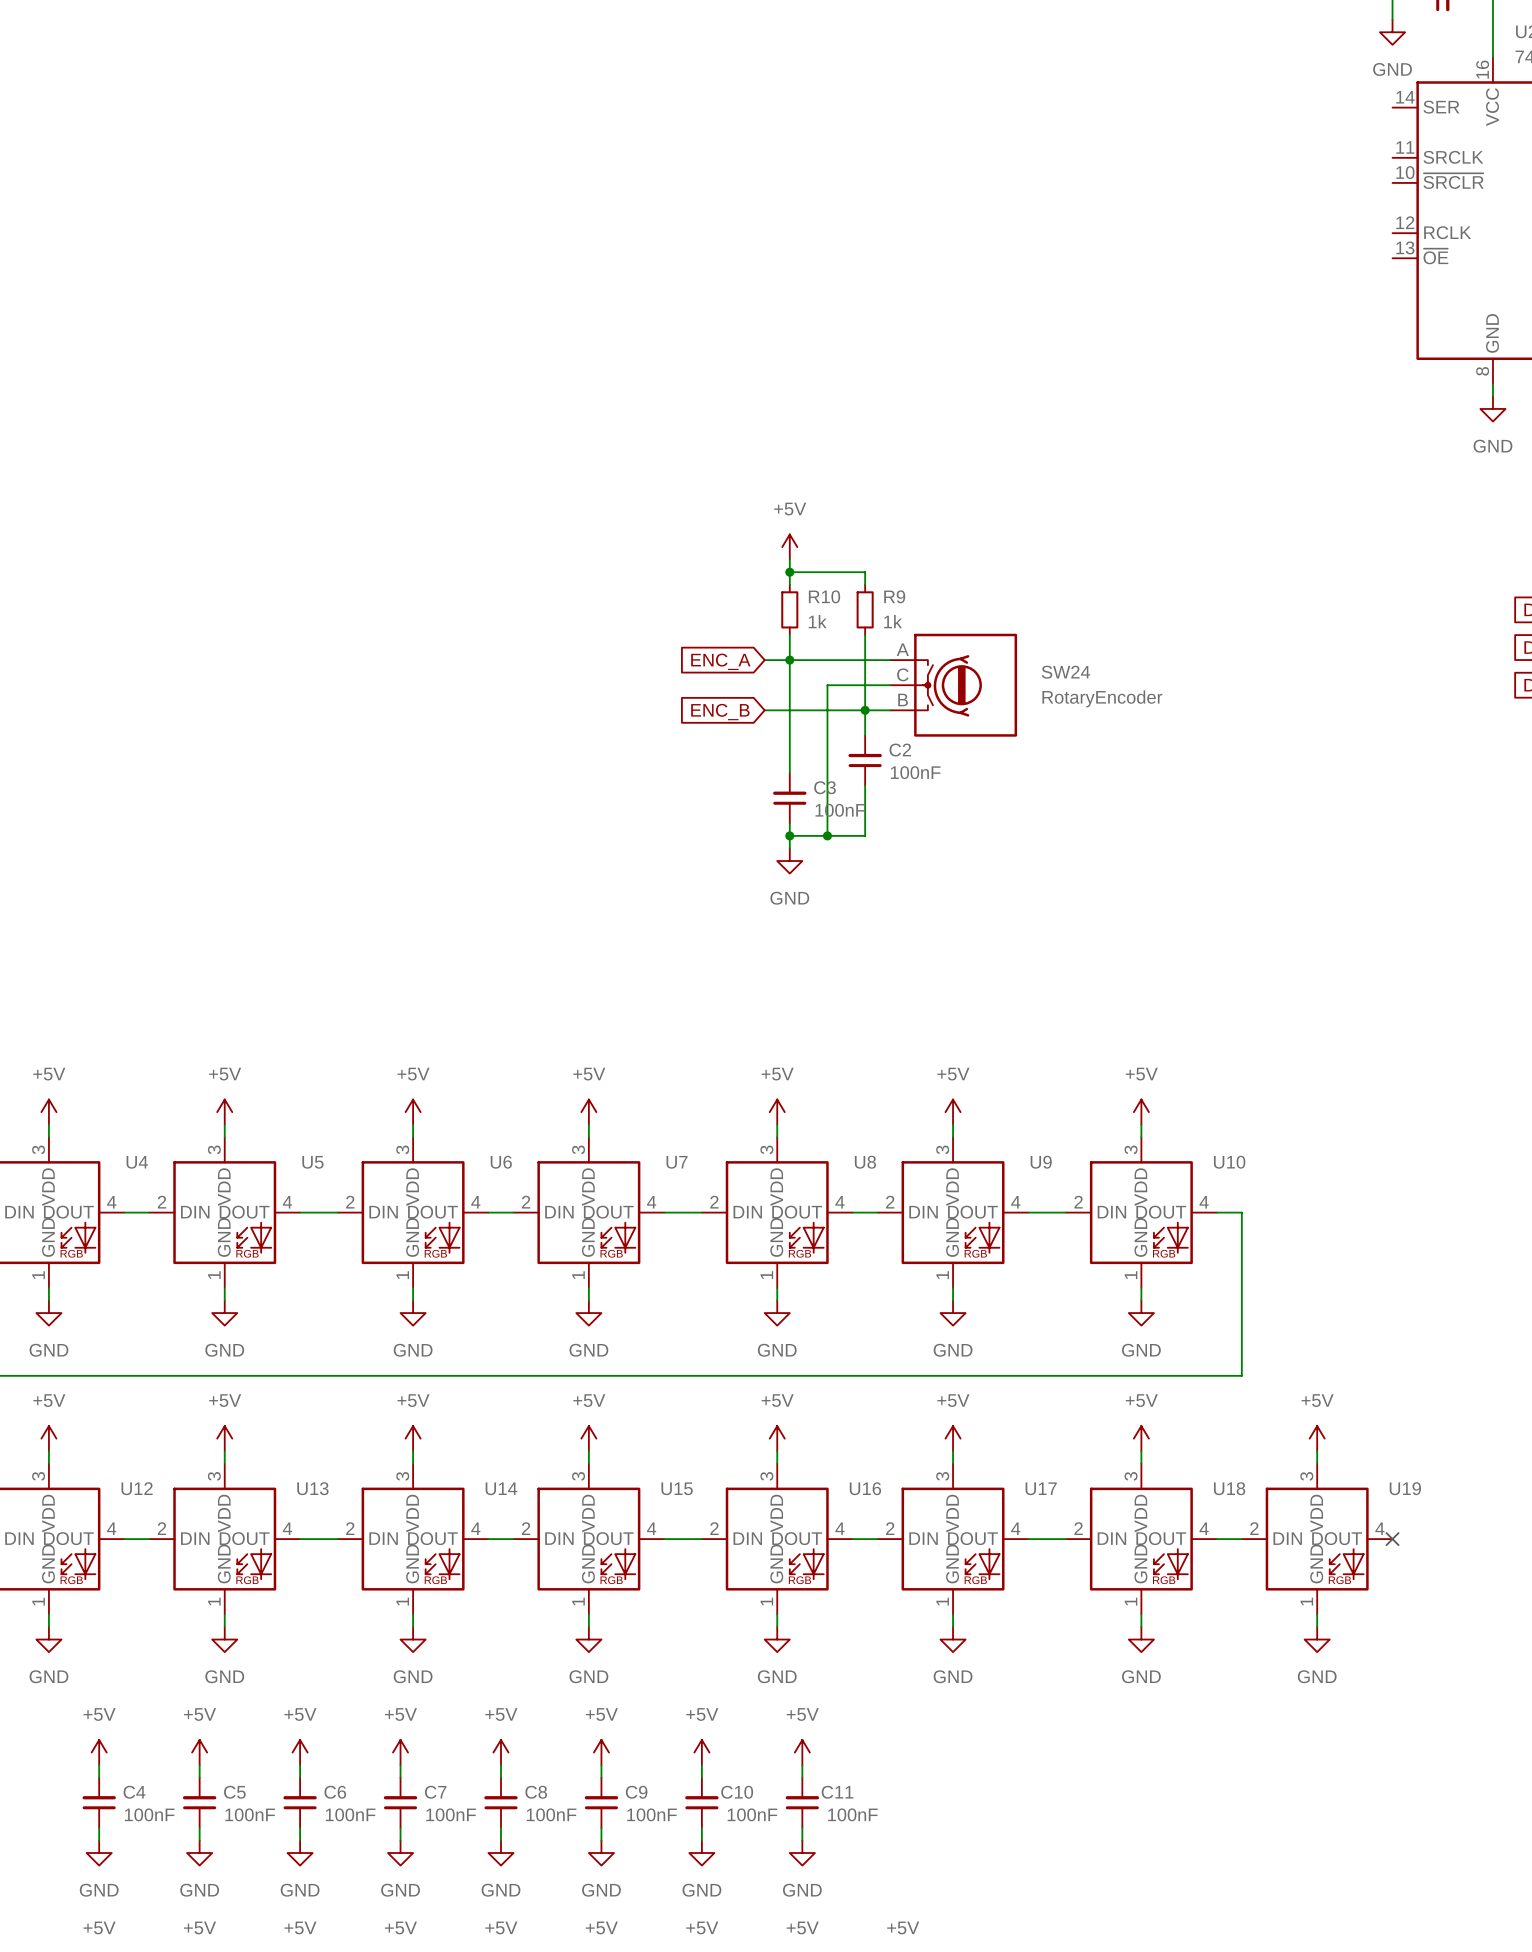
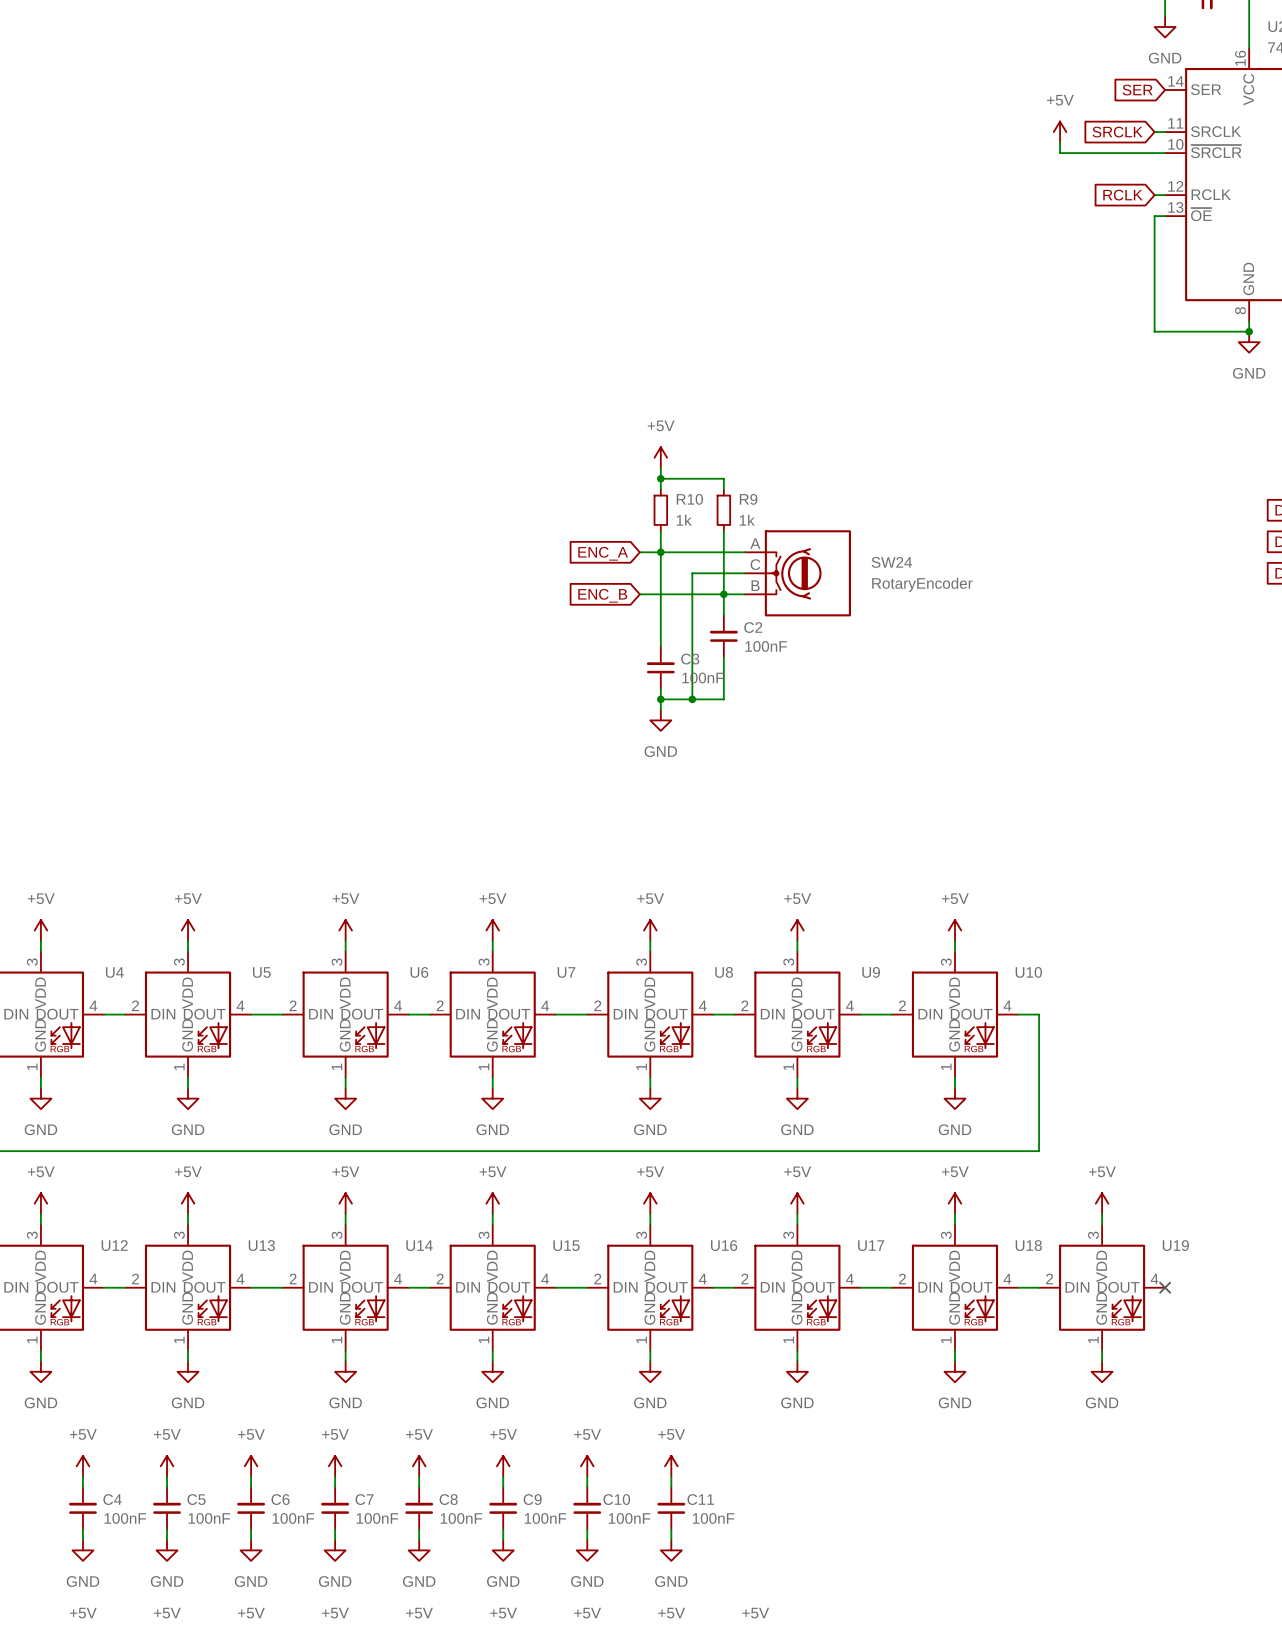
global label: none -> SER (1137, 90)
power symbol: none -> +5V (1060, 132)
global label: none -> SRCLK (1117, 132)
wire: none -> (1154, 132) (1165, 132)
wire: none -> (1060, 142) (1060, 153) (1165, 153)
global label: none -> RCLK (1122, 195)
wire: none -> (1154, 195) (1165, 195)
wire: none -> (1165, 216) (1154, 216) (1154, 331) (1249, 331)
junction: none -> (1249, 331)

